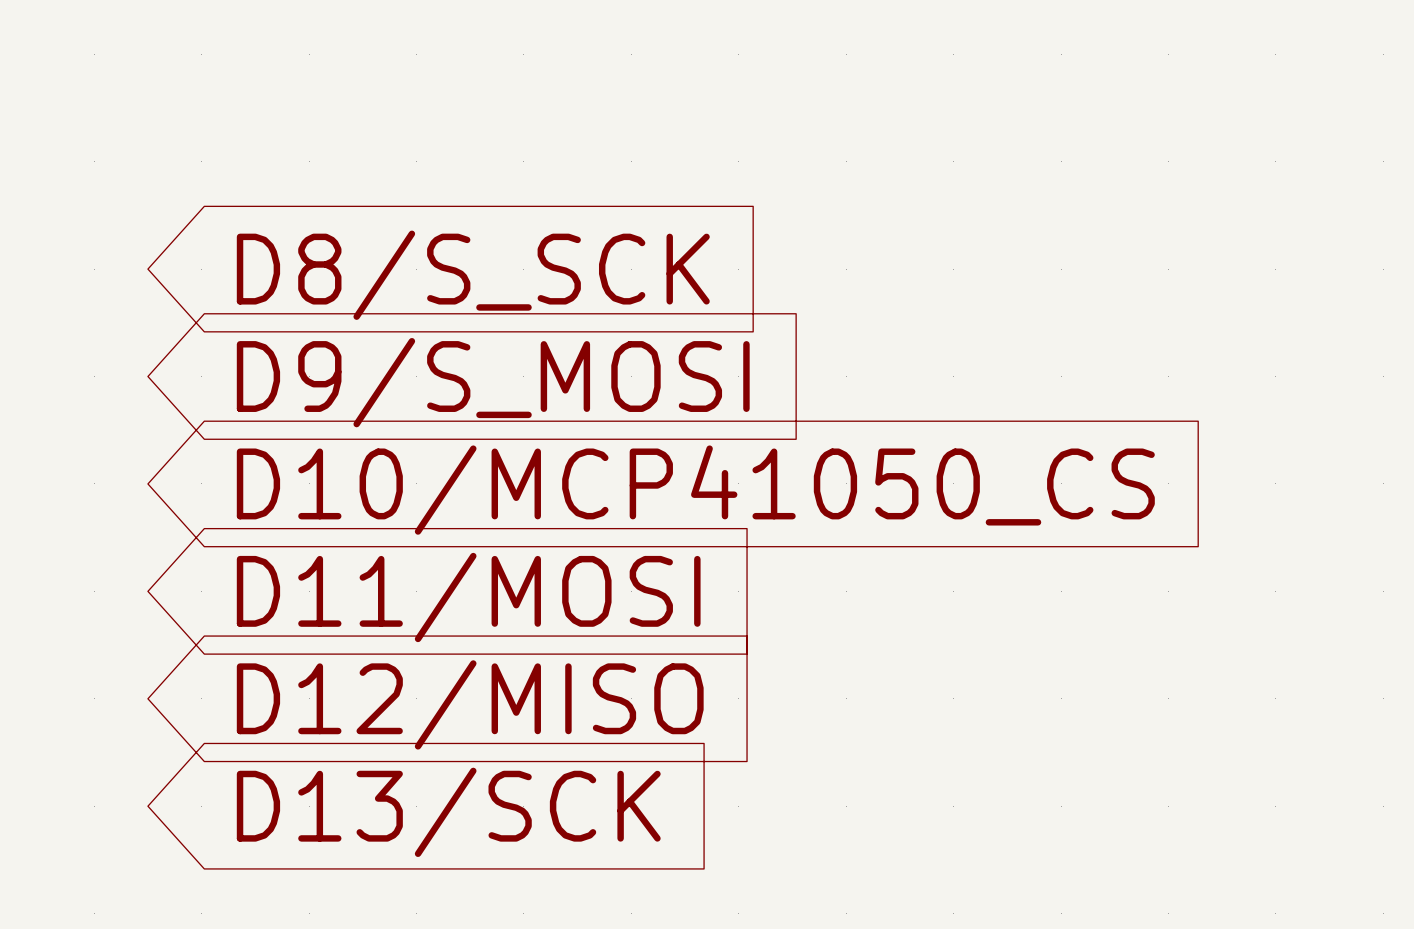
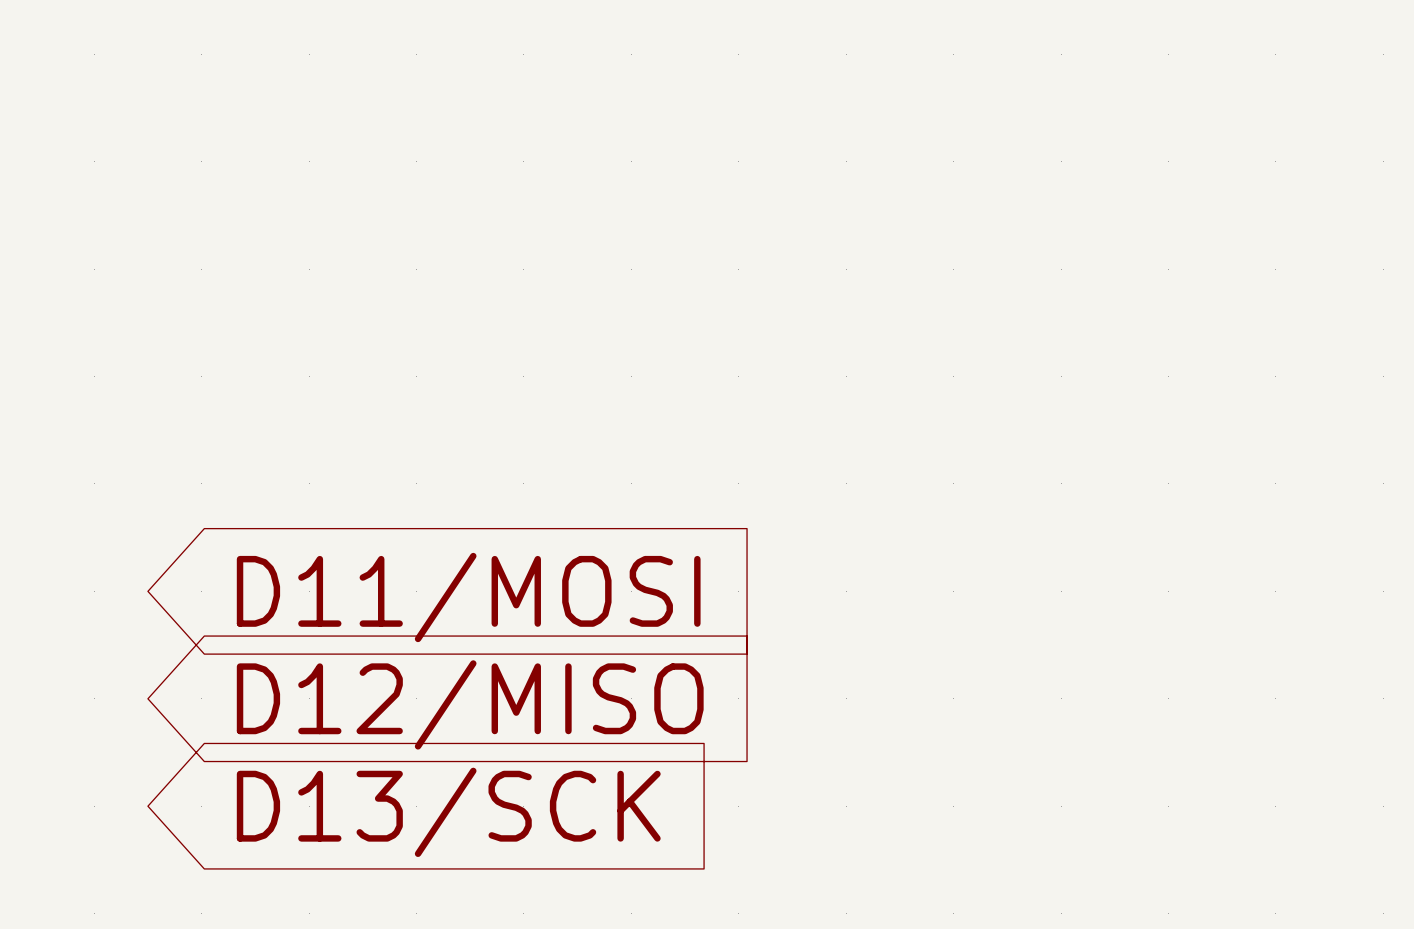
global label: D8/S_SCK (473, 275) -> none
global label: D9/S_MOSI (493, 382) -> none
global label: D10/MCP41050_CS (695, 490) -> none

